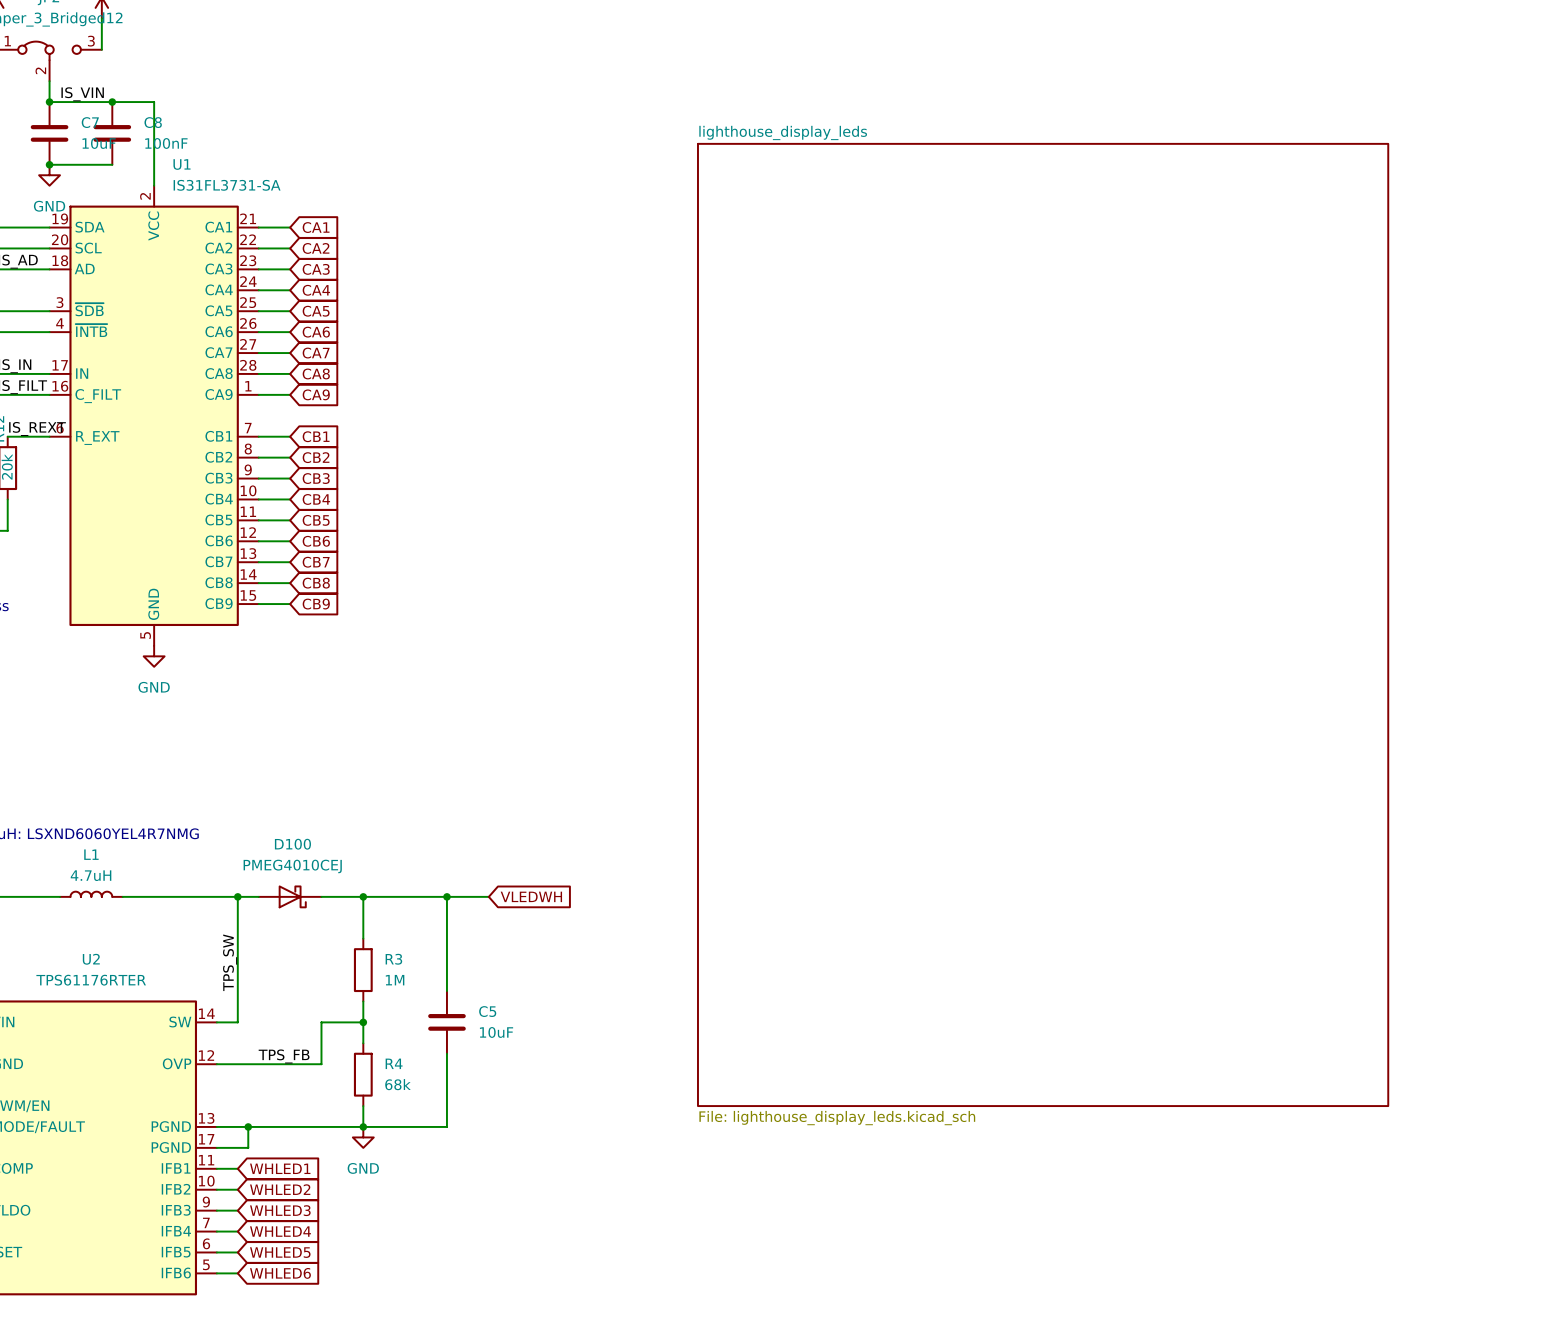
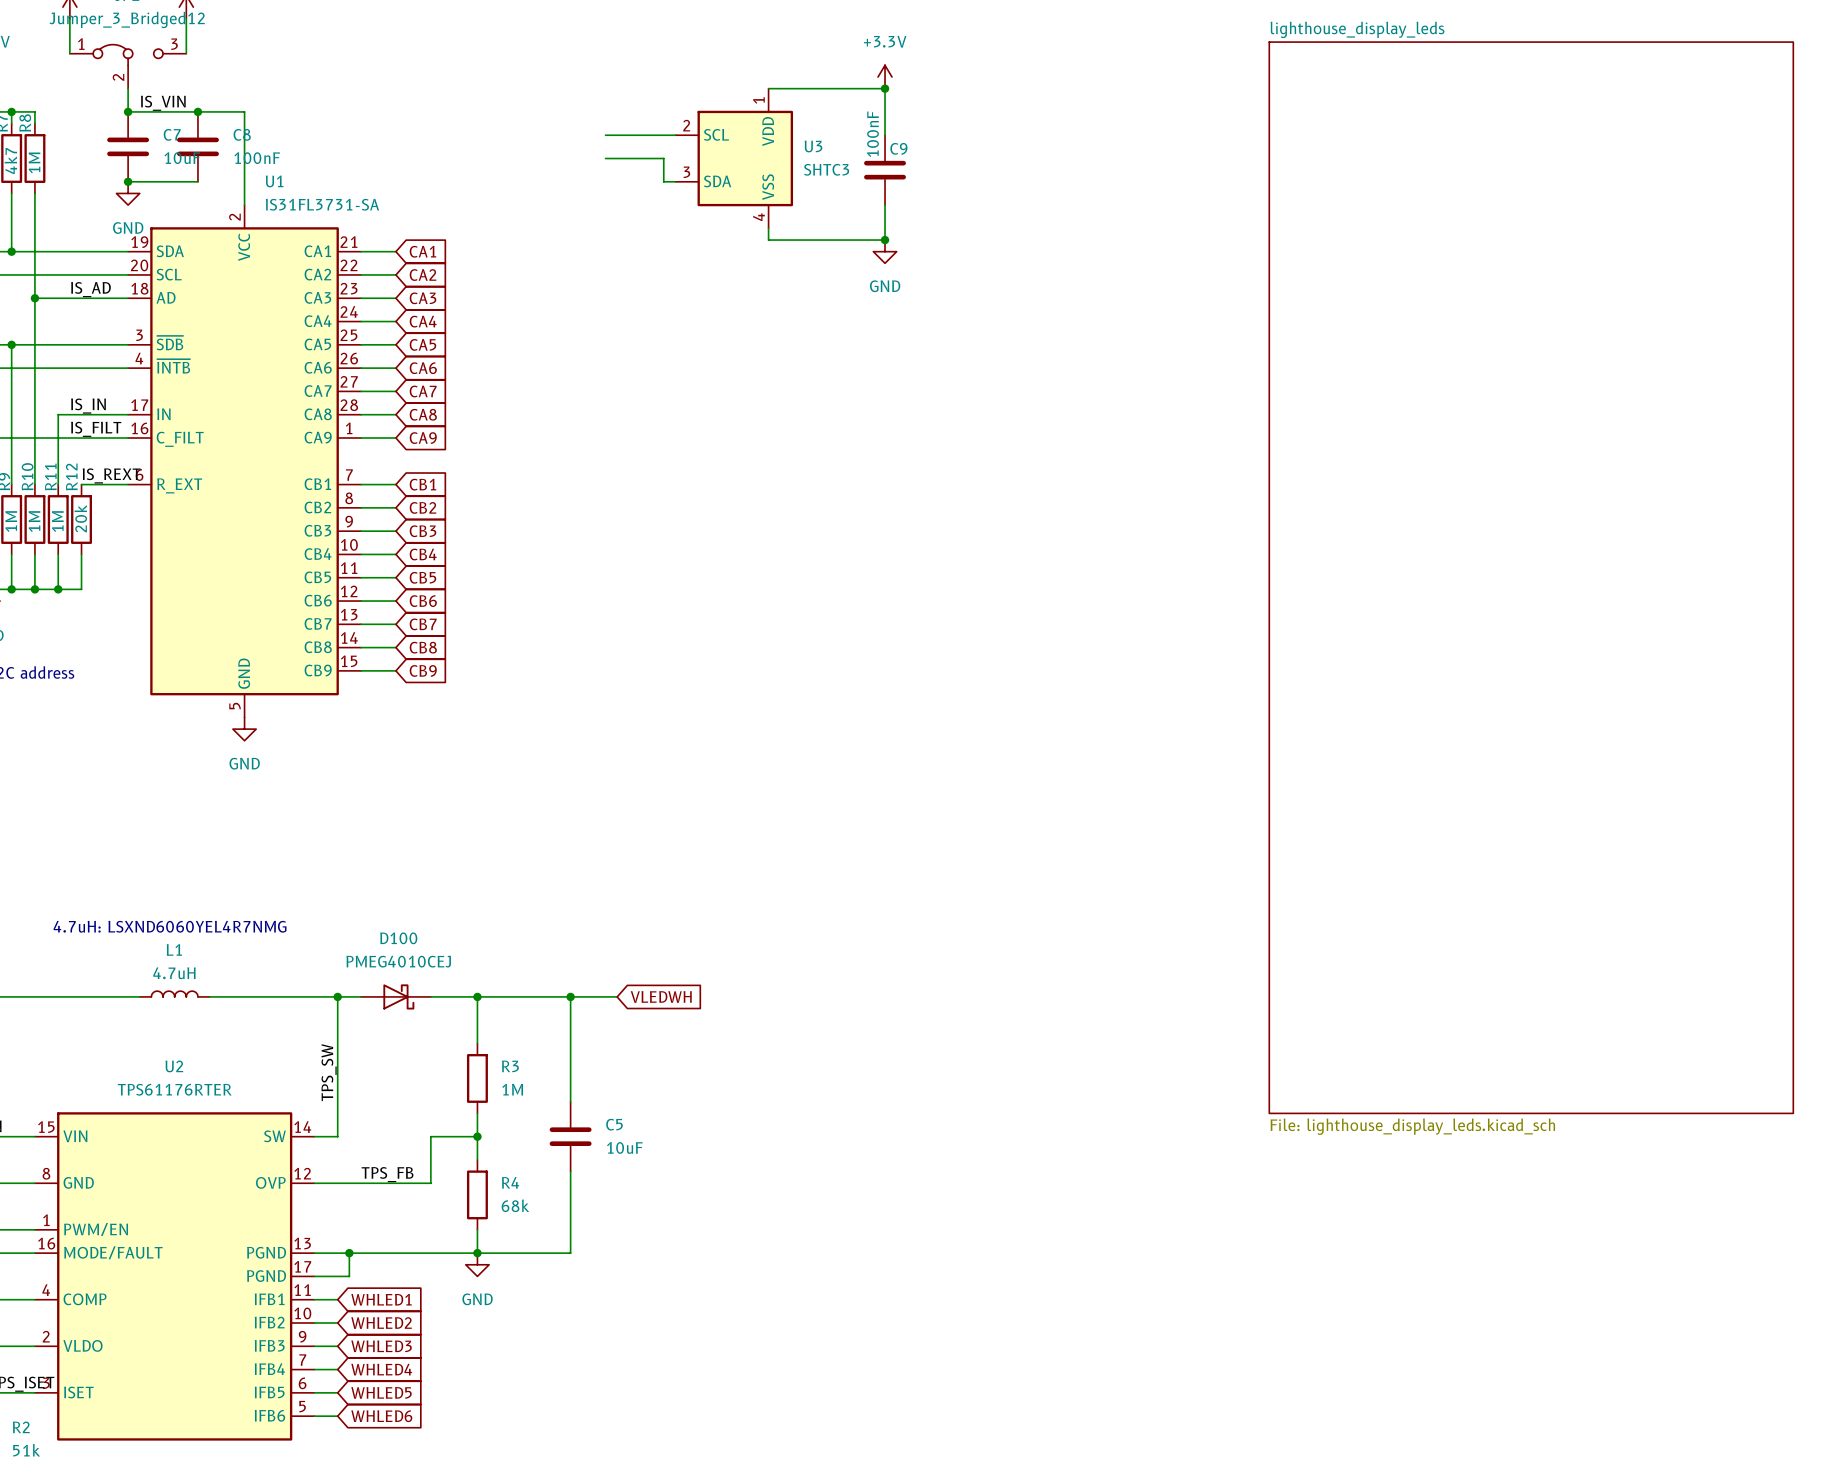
power symbol: none -> +3.3V (885, 77)
wire: none -> (768, 88) (885, 88) (885, 135)
junction: none -> (885, 88)
wire: none -> (605, 135) (675, 135)
wire: none -> (605, 158) (663, 158) (663, 181) (675, 181)
U3: none -> SHTC3 (734, 158)
C9: none -> 100nF (885, 170)
wire: none -> (885, 205) (885, 240) (768, 240) (768, 228)
junction: none -> (885, 240)
power symbol: none -> GND (885, 251)
sheet lighthouse_display_leds: none -> File: lighthouse_display_leds.kicad_sch (1531, 577)
sheet lighthouse_display_leds: File: lighthouse_display_leds.kicad_sch (1043, 624) -> none

